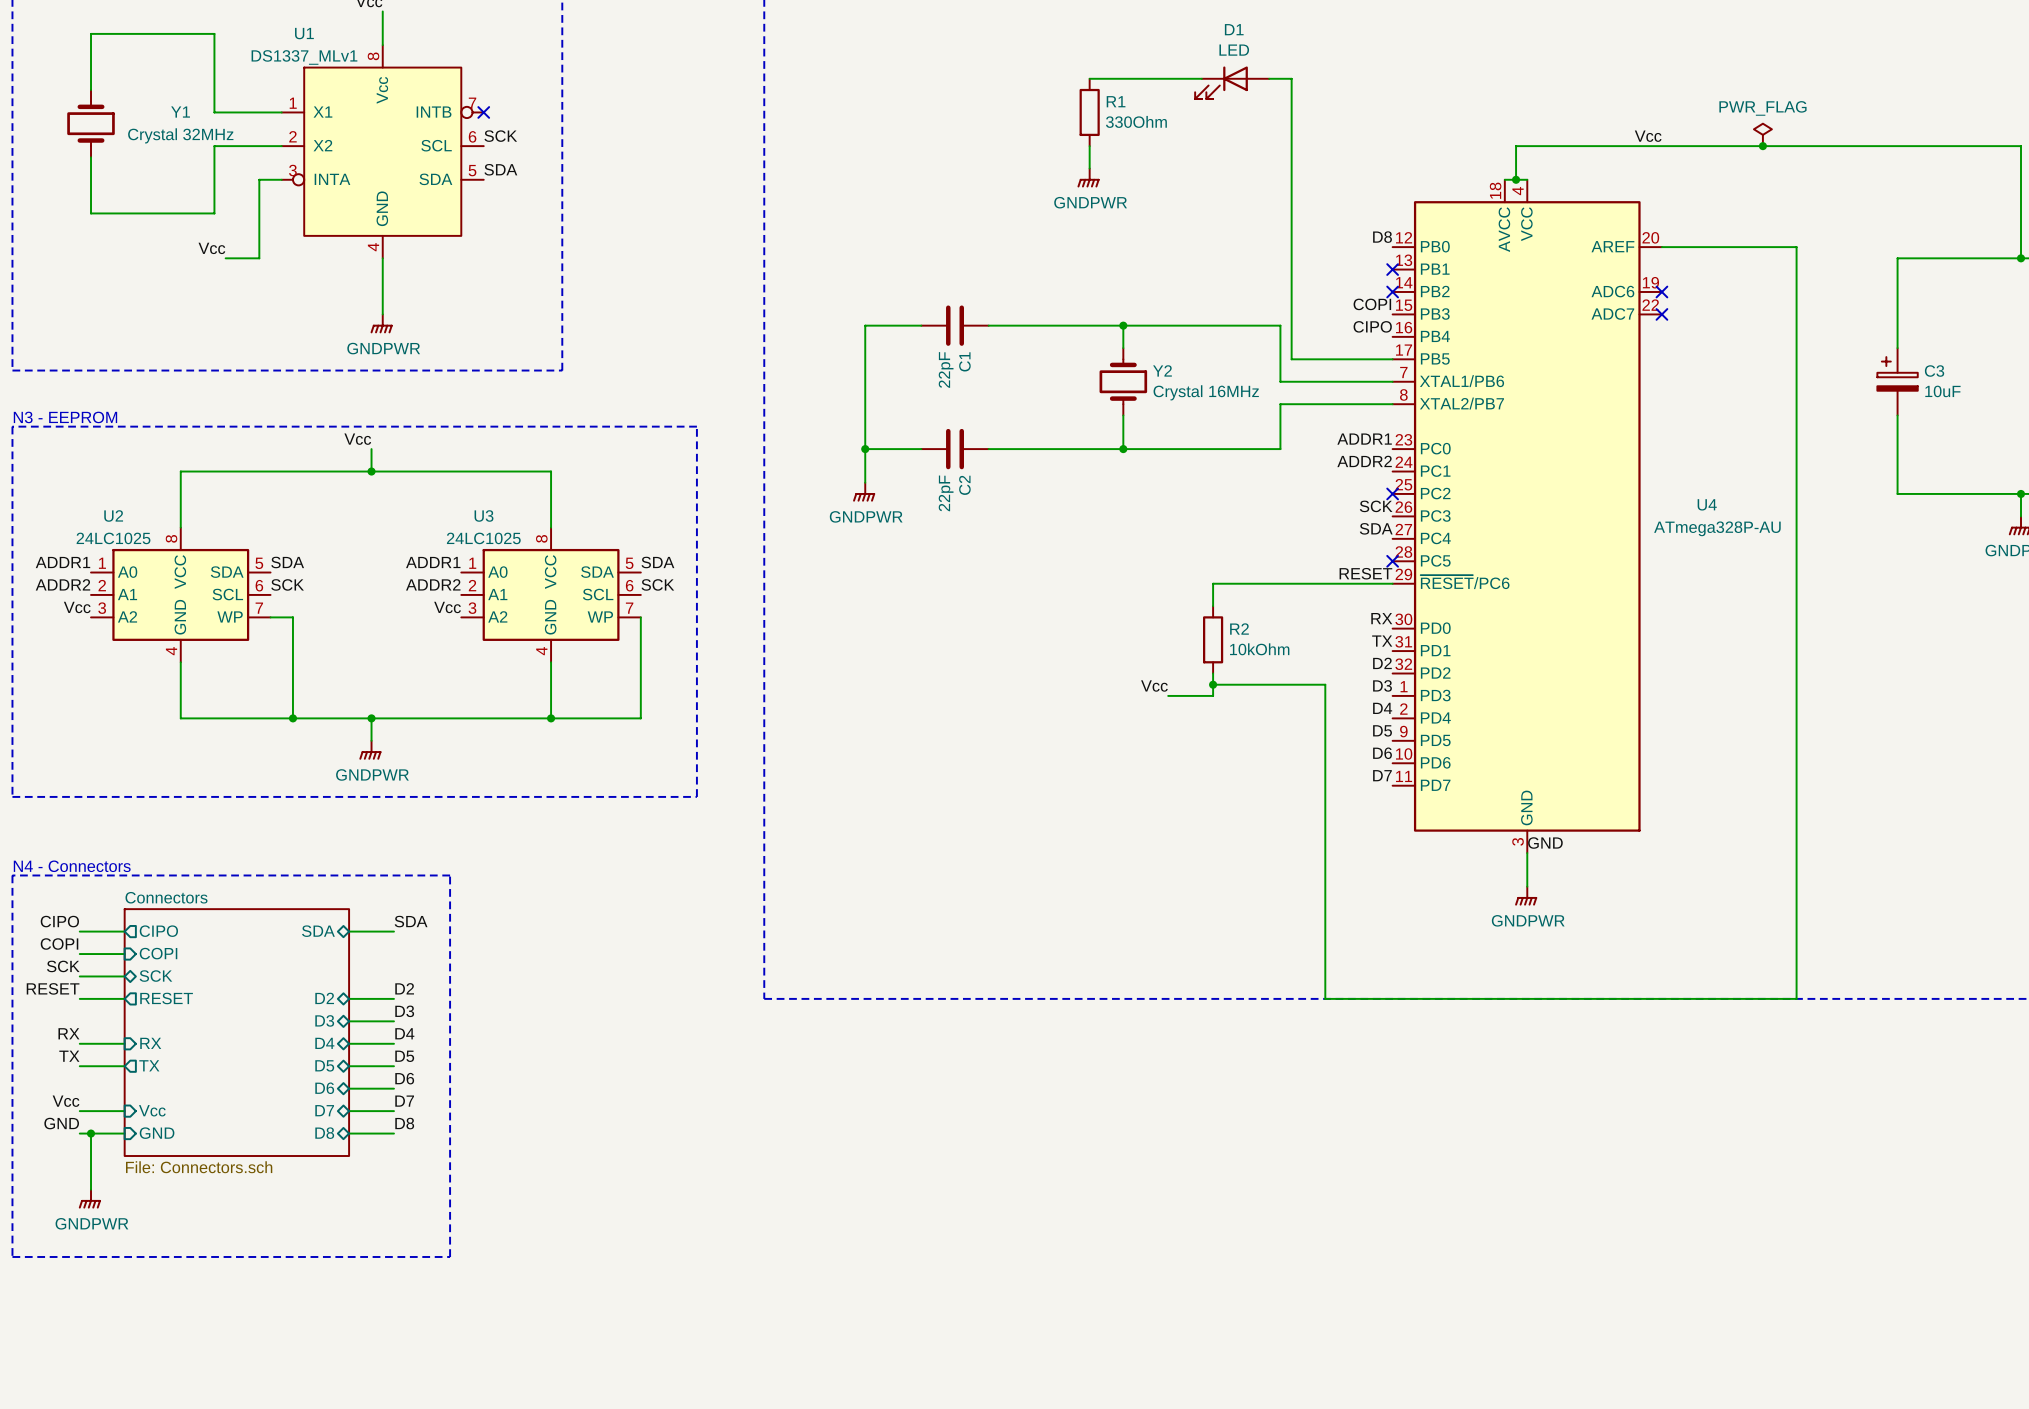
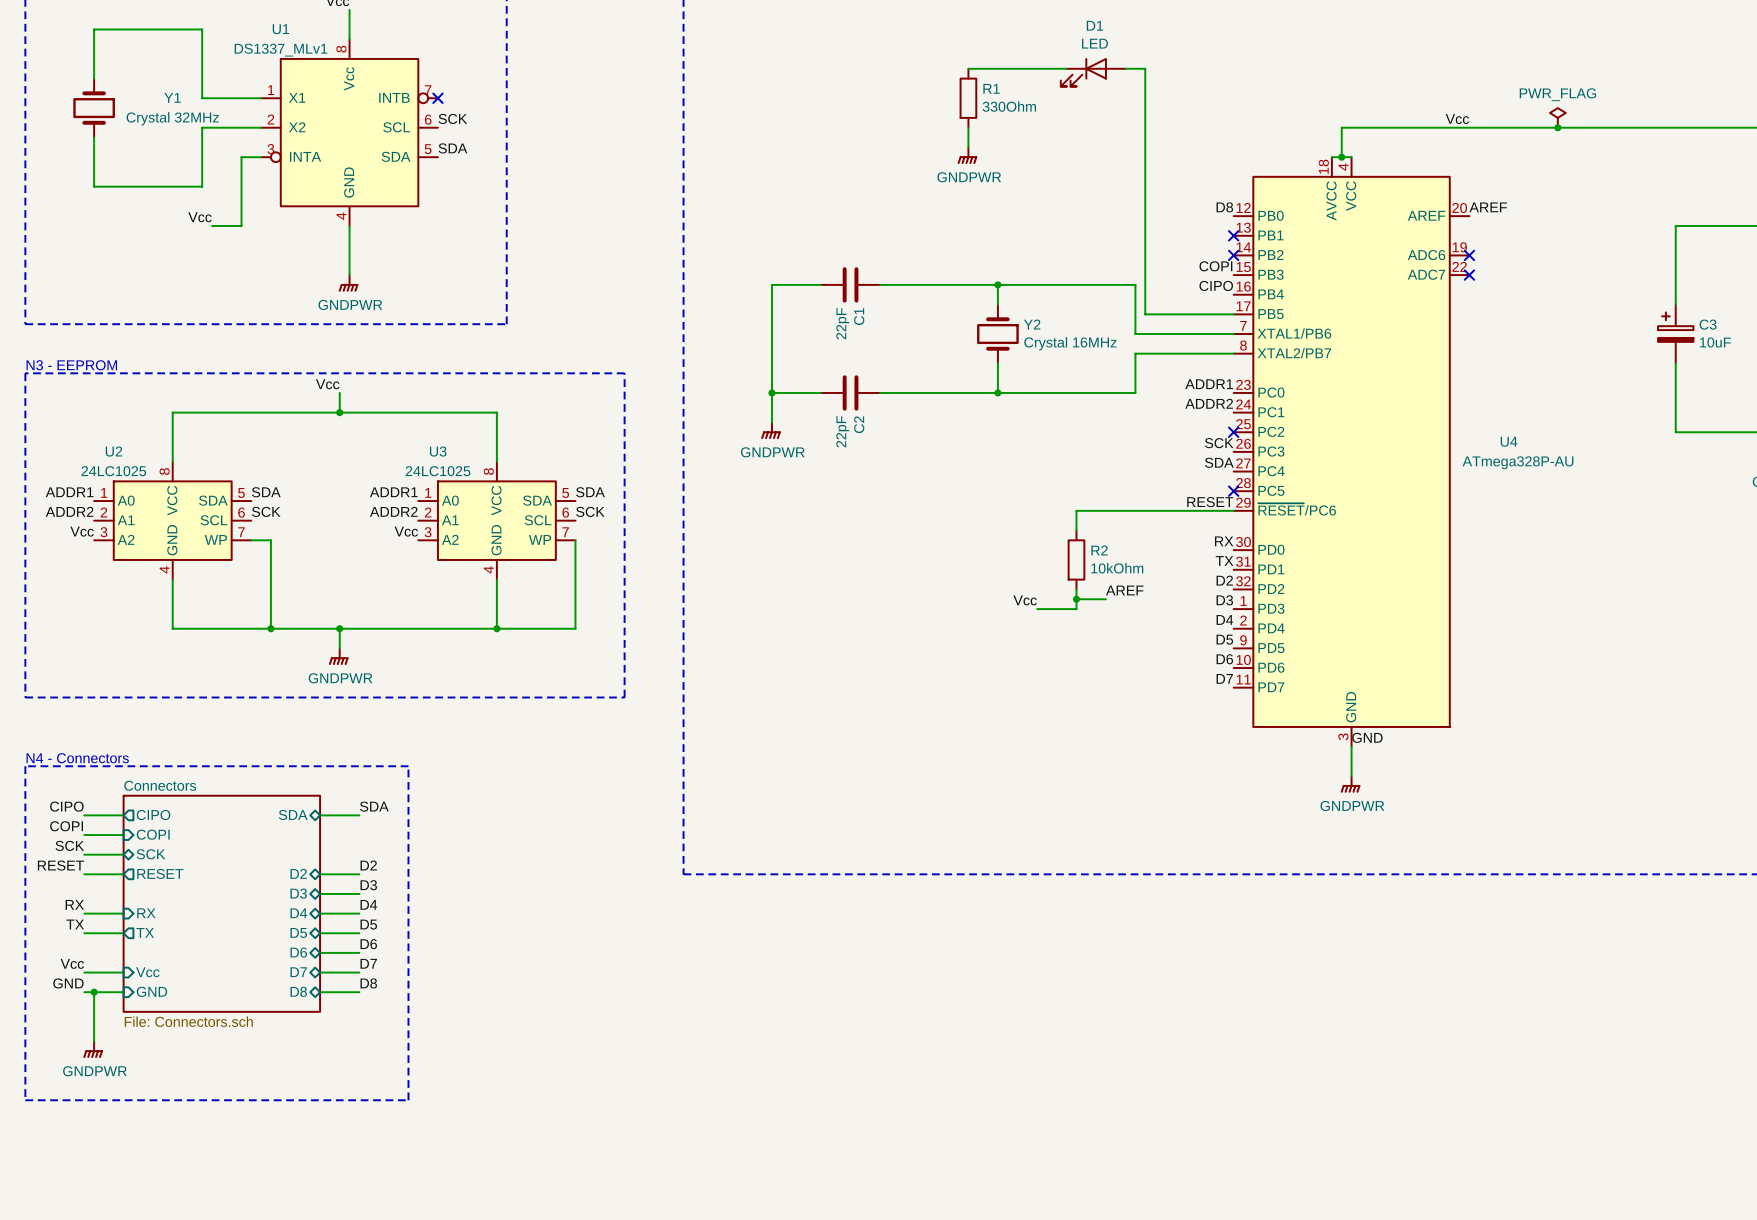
label: none -> AREF (1488, 207)
wire: (1661, 247) (1796, 247) (1796, 998) (1325, 998) (1325, 684) (1246, 684) -> none
label: none -> AREF (1124, 590)

